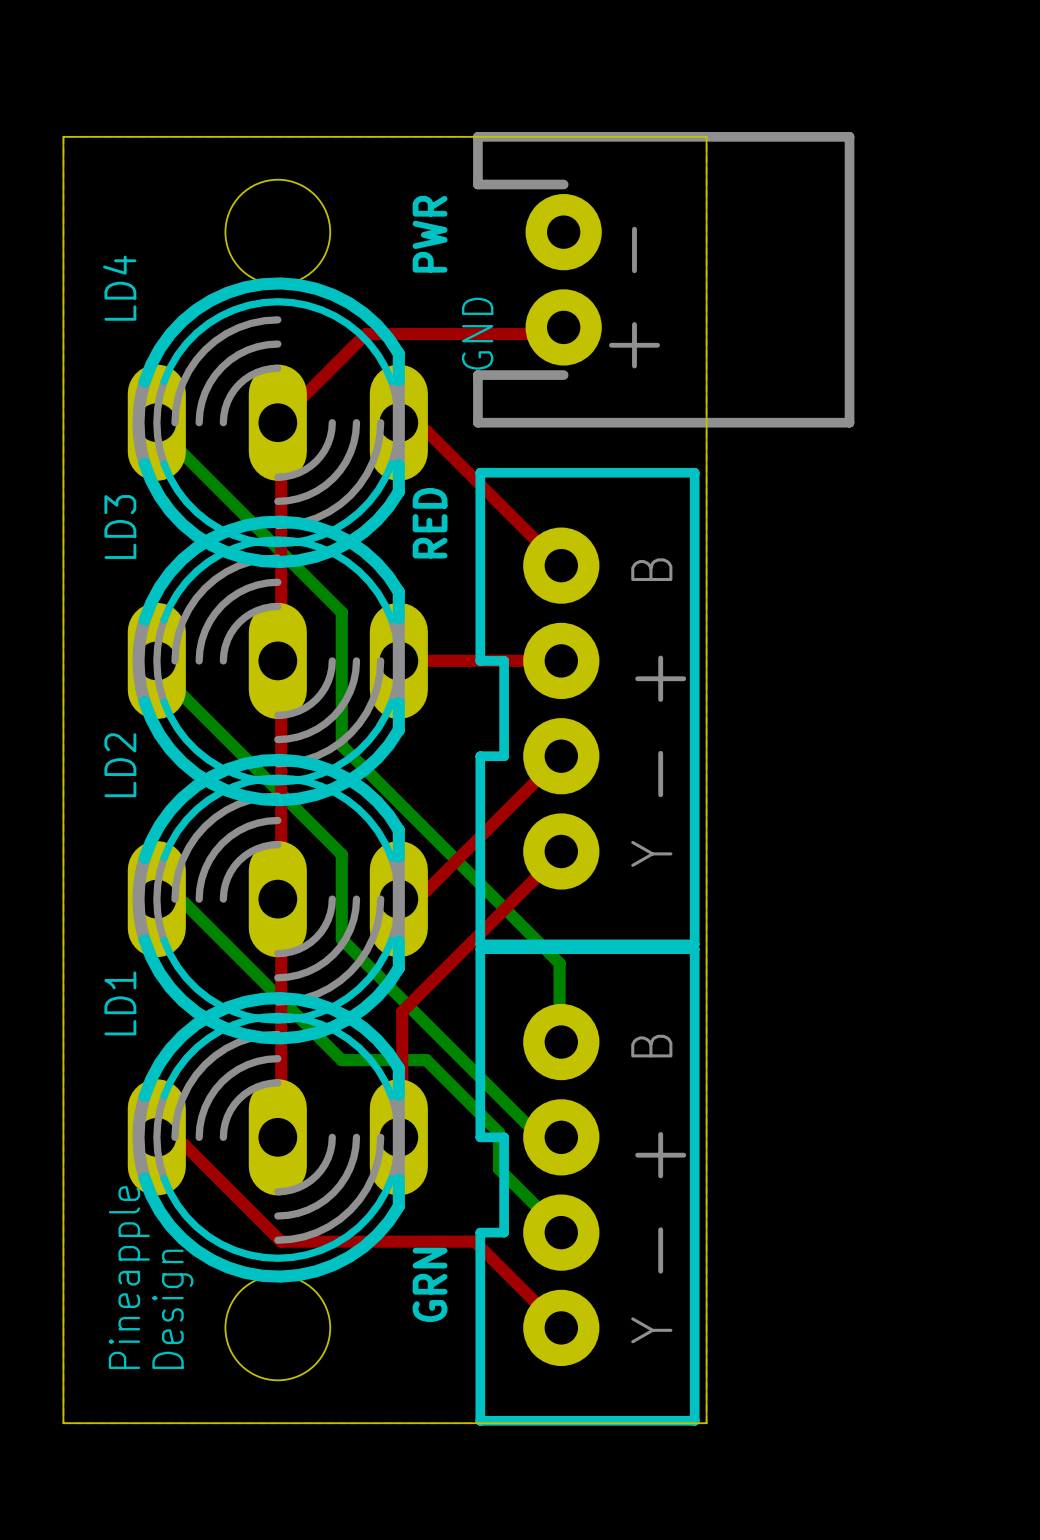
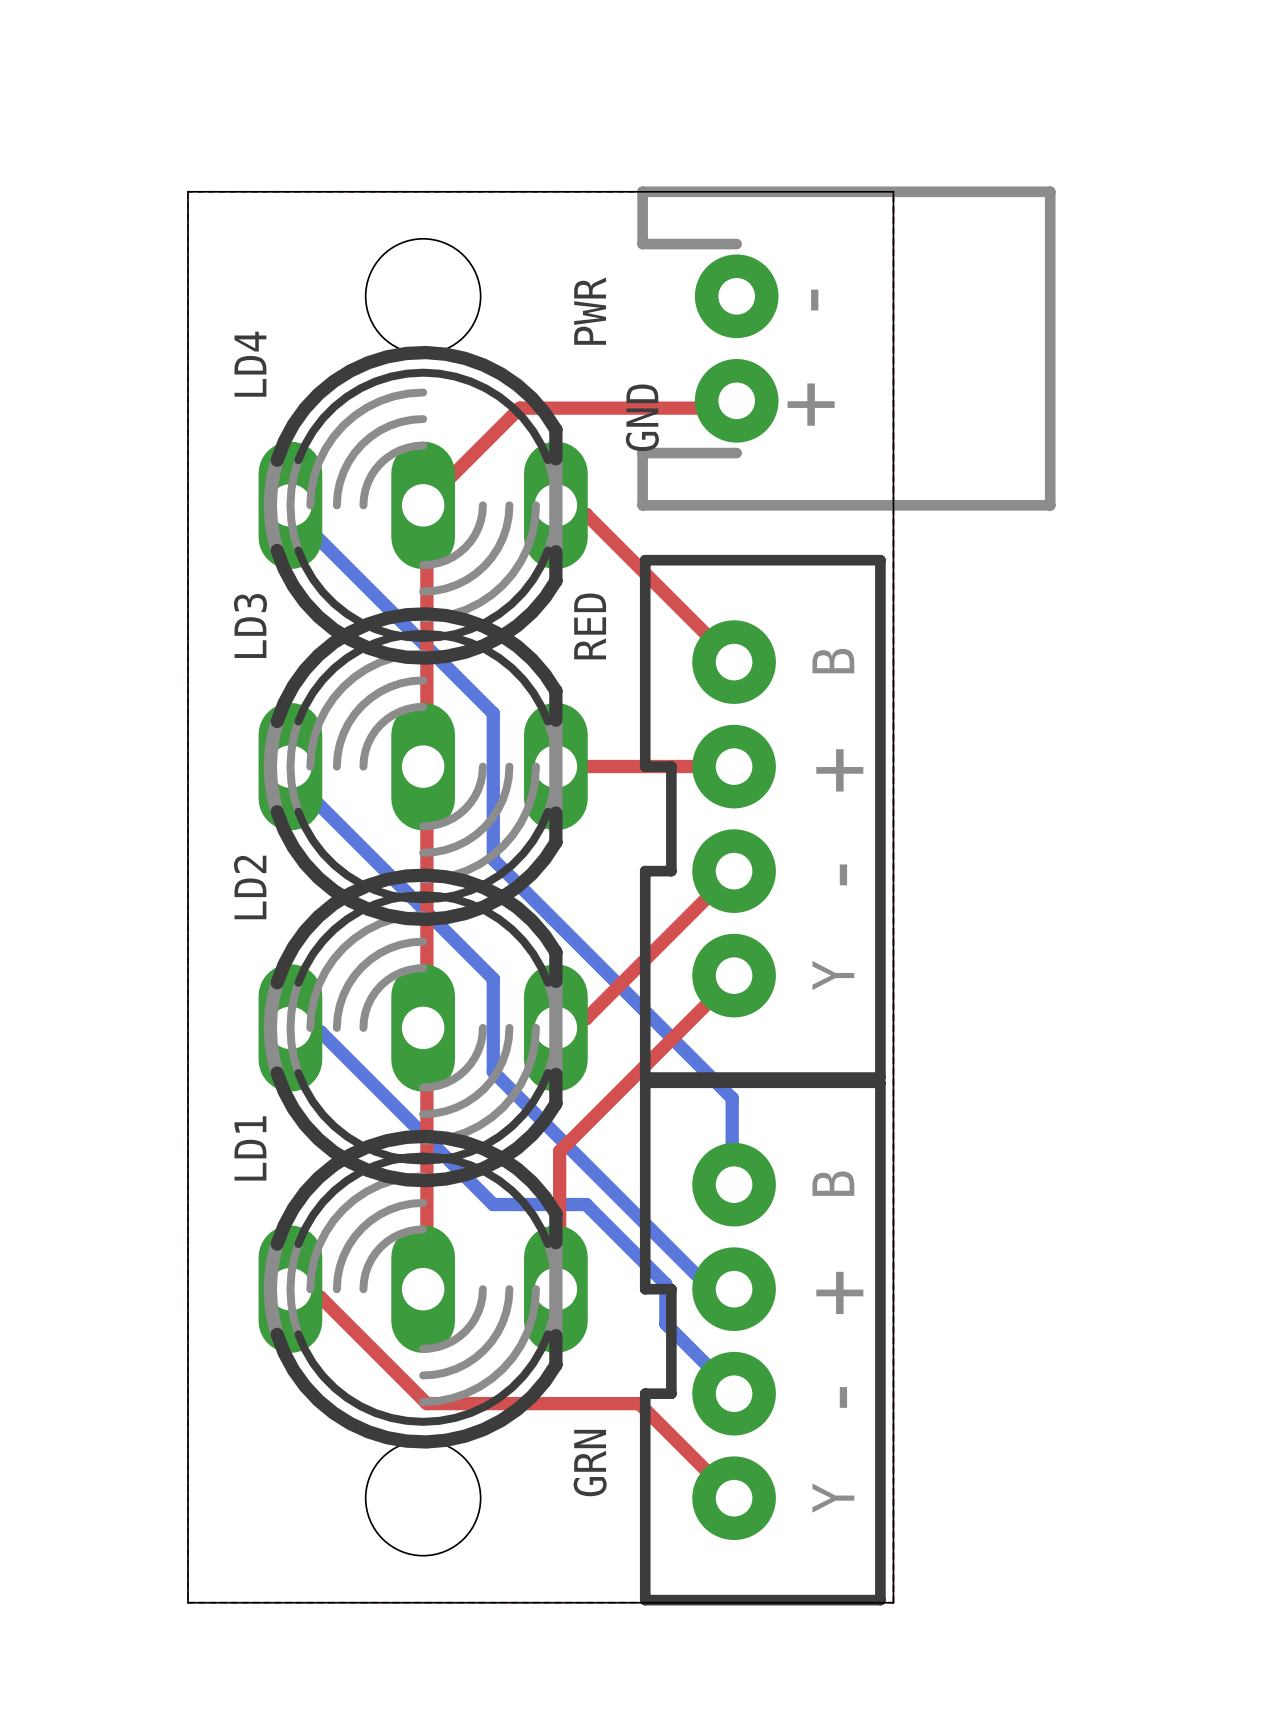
text: Pineapple (129, 1277) -> none
text: Design (172, 1309) -> none

